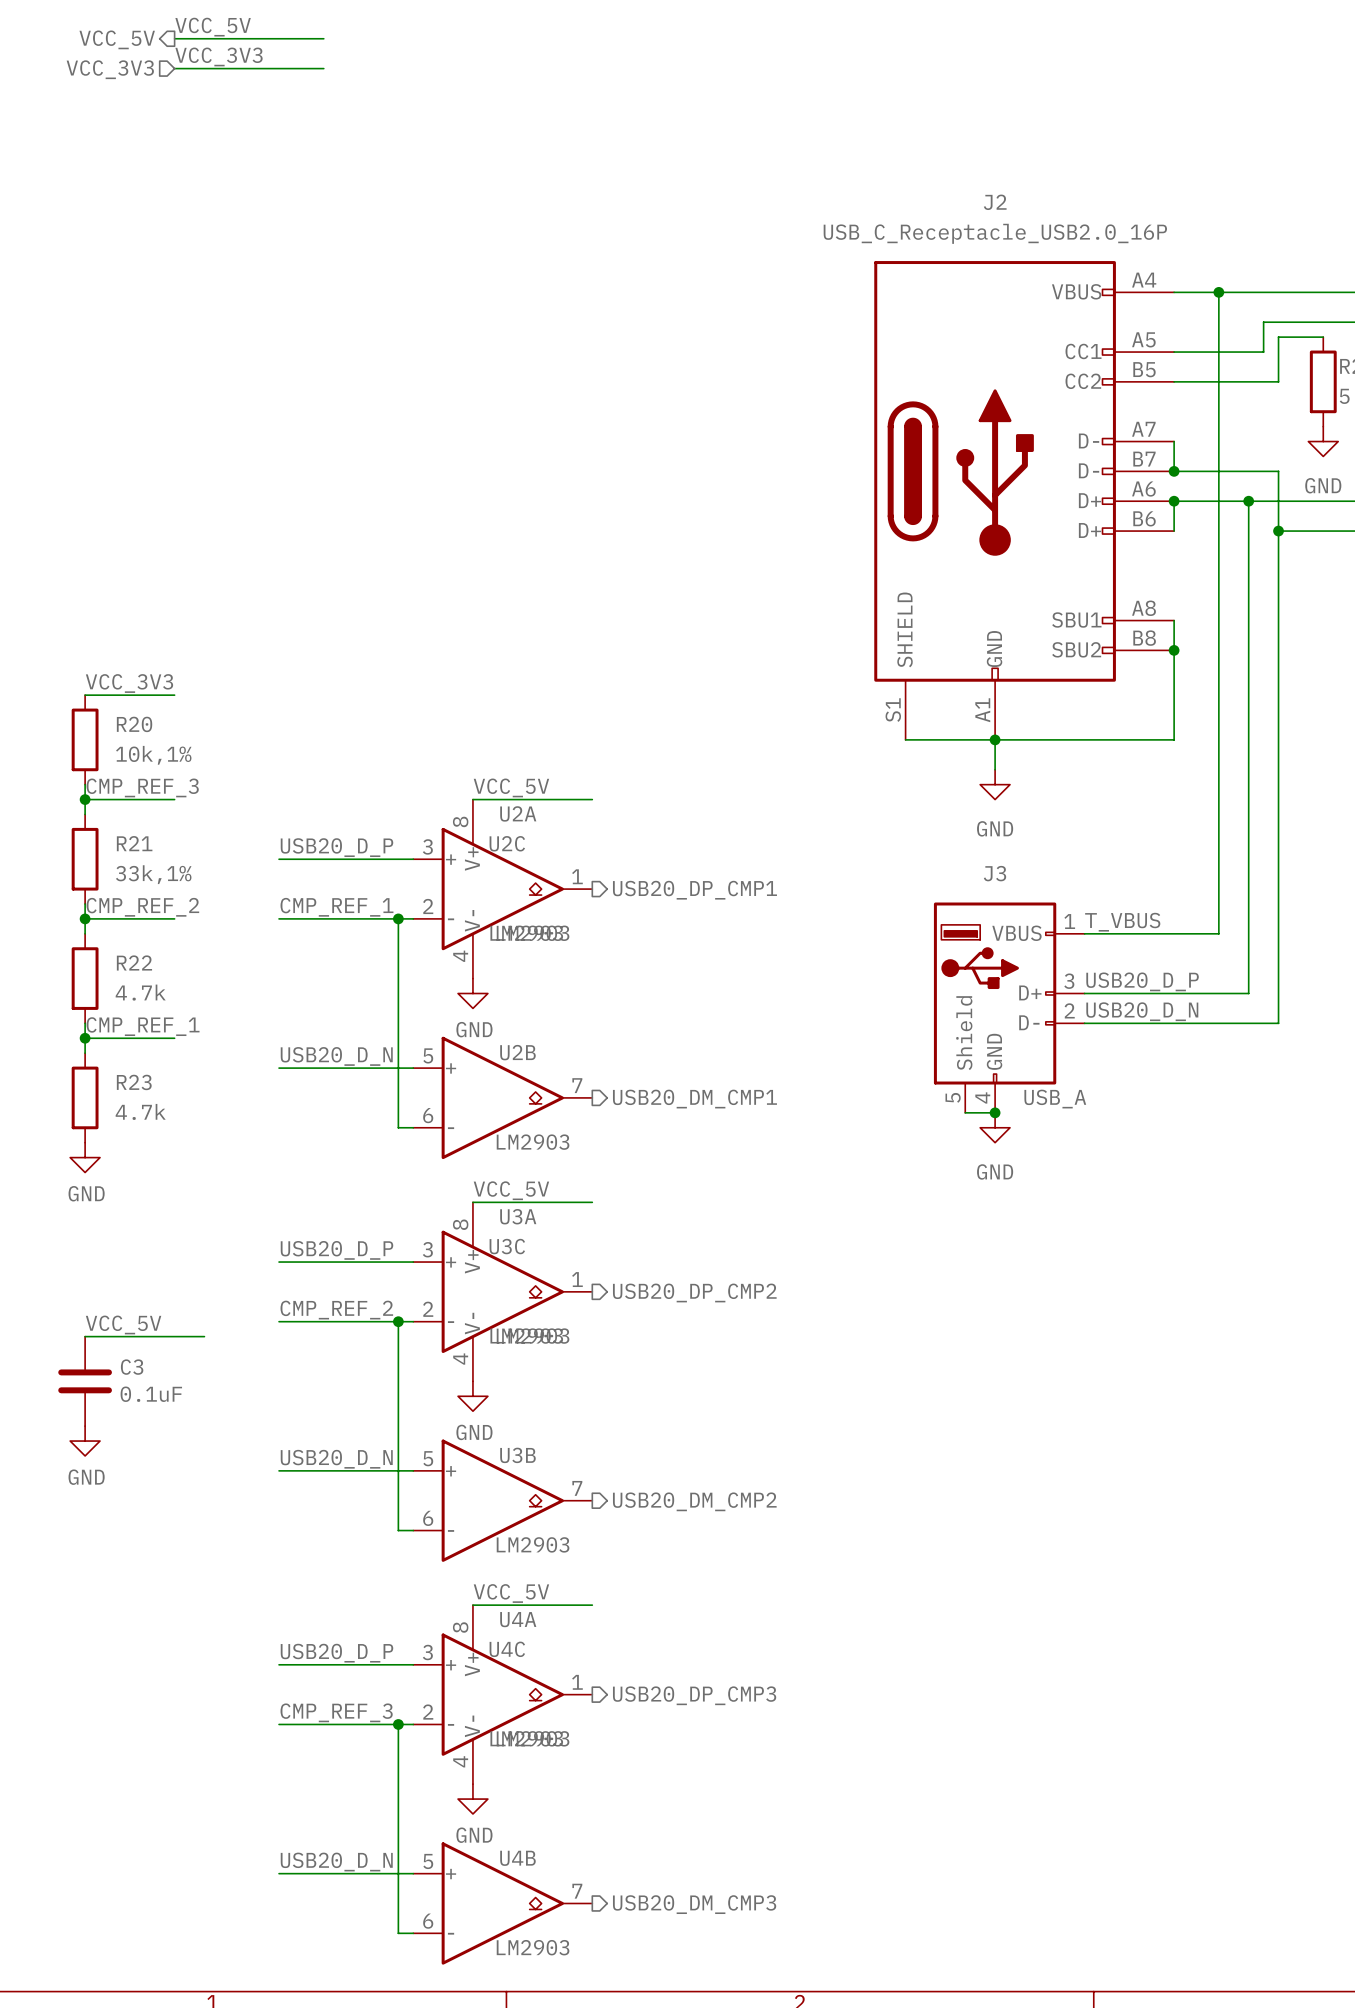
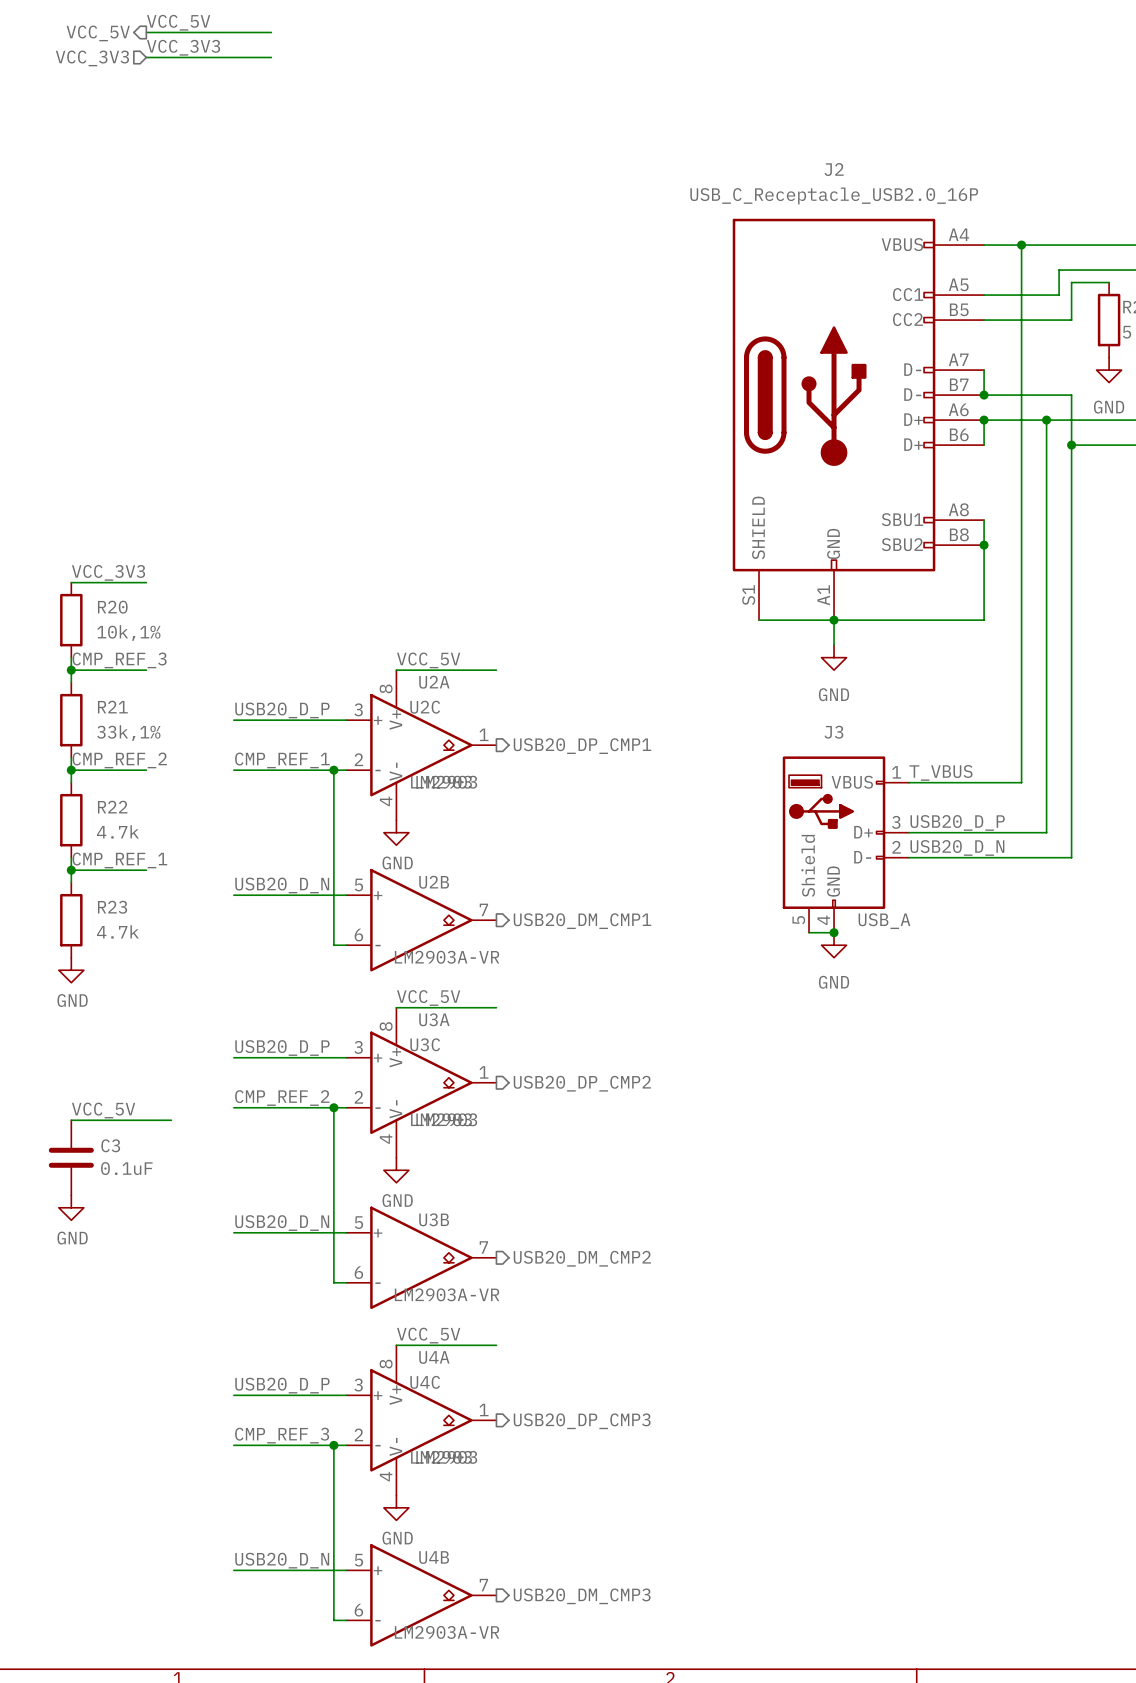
U2B value: LM2903 (533, 1142) -> LM2903A-VR (447, 957)
U3B value: LM2903 (533, 1544) -> LM2903A-VR (447, 1294)
U4B value: LM2903 (533, 1947) -> LM2903A-VR (447, 1632)

